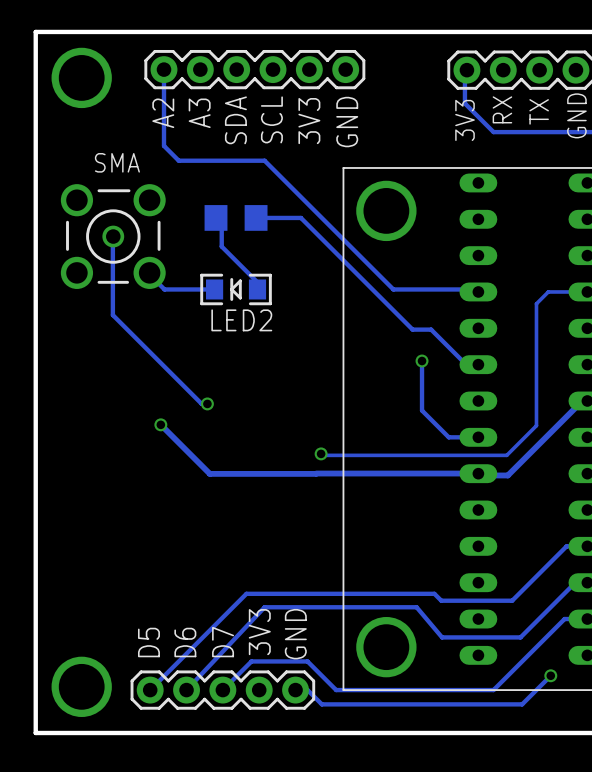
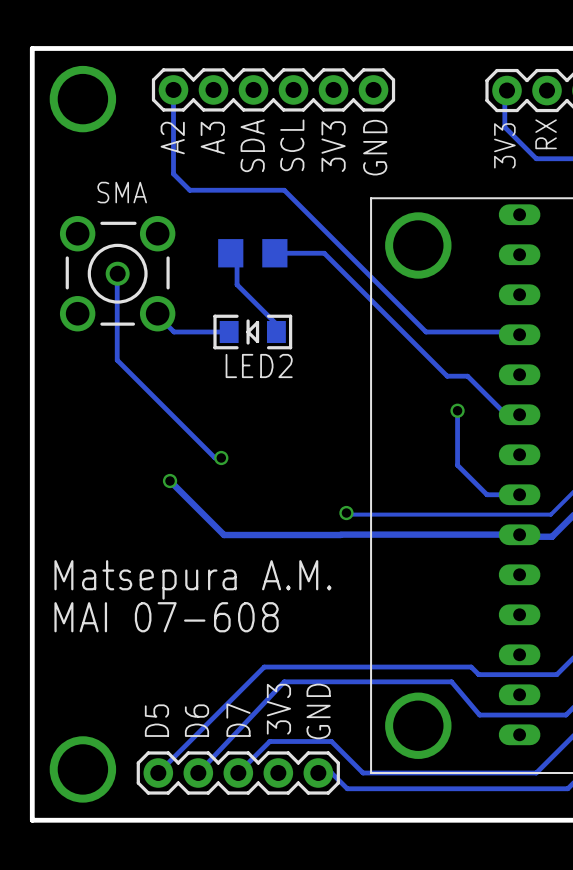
text: none -> Matsepura A.M. (192, 579)
text: none -> MAI 07-608 (166, 617)

